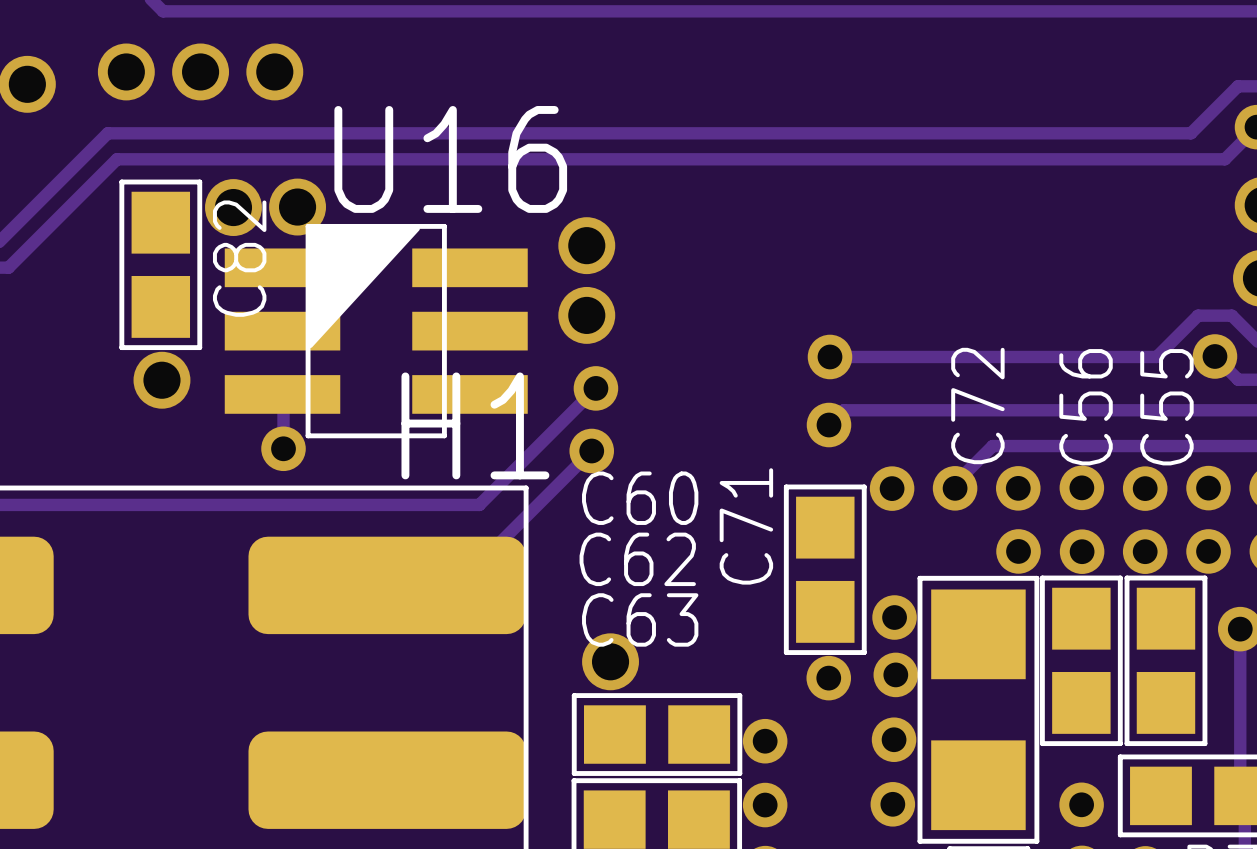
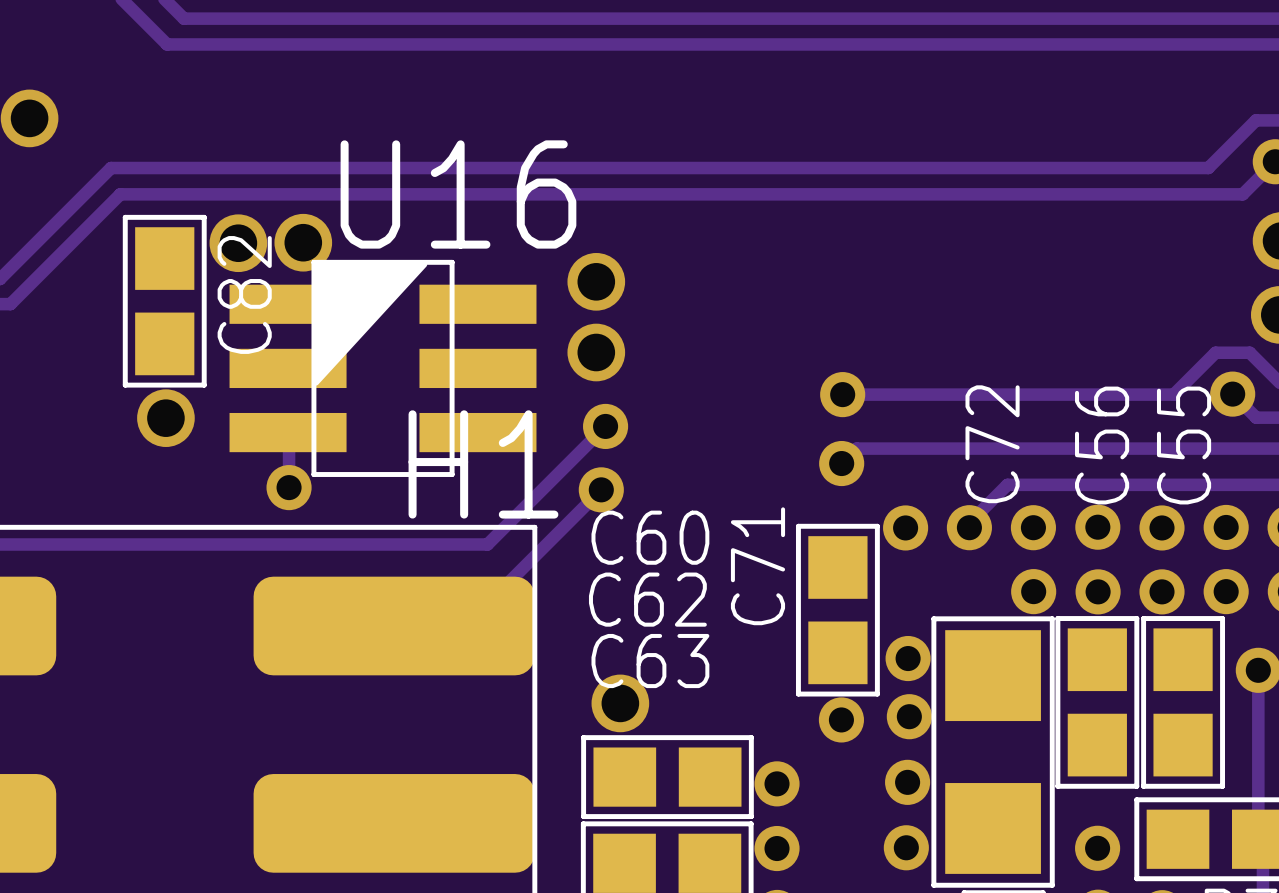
via: (126, 71) -> none
via: (200, 71) -> none
via: (274, 71) -> none

